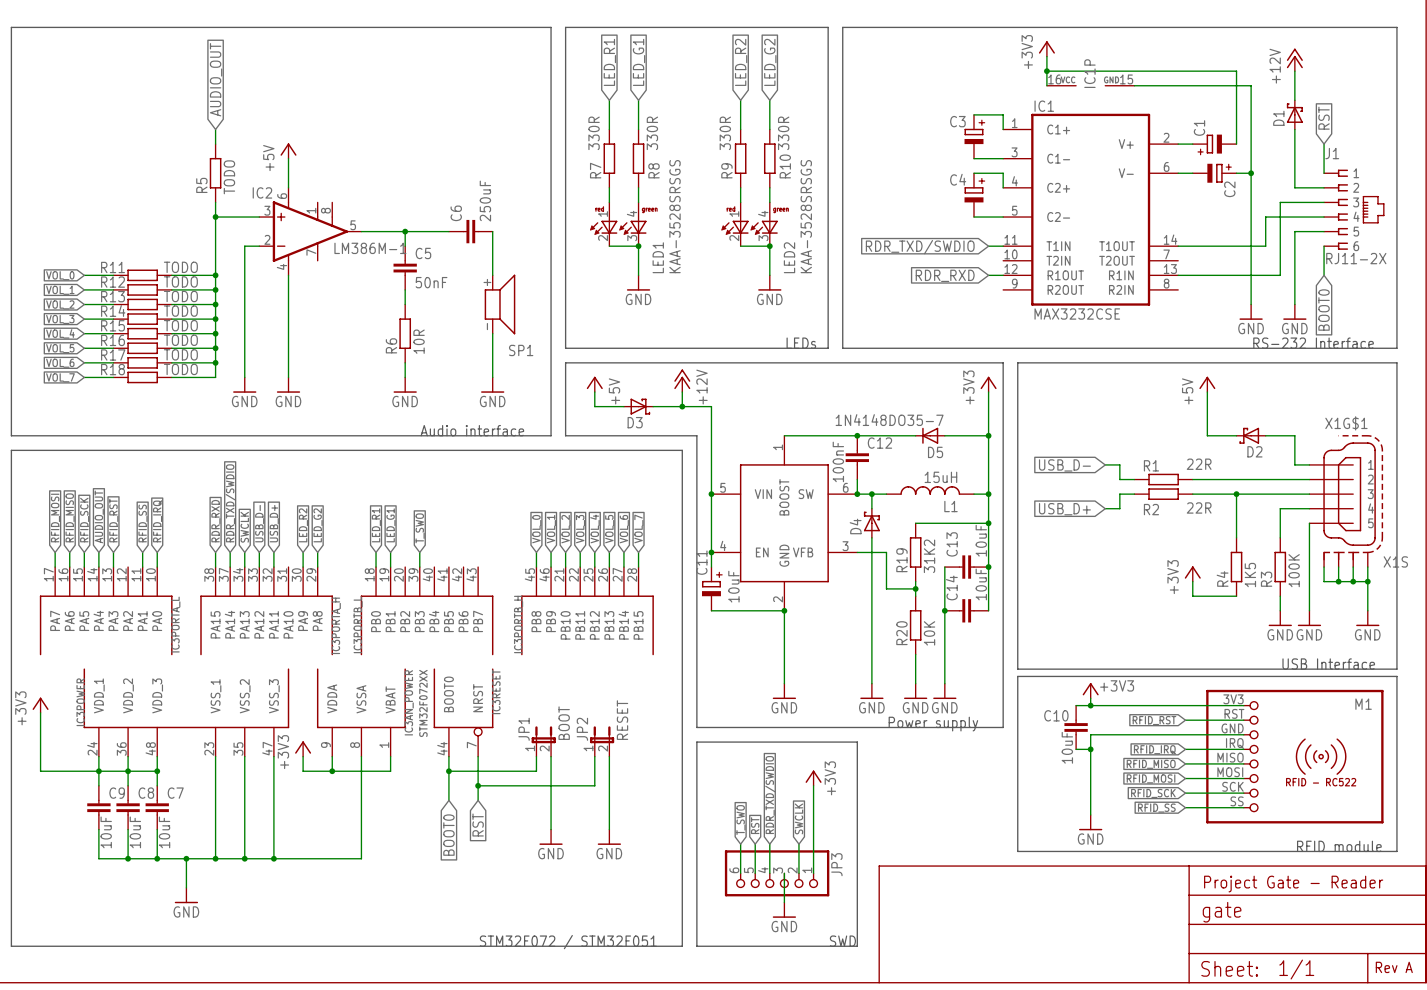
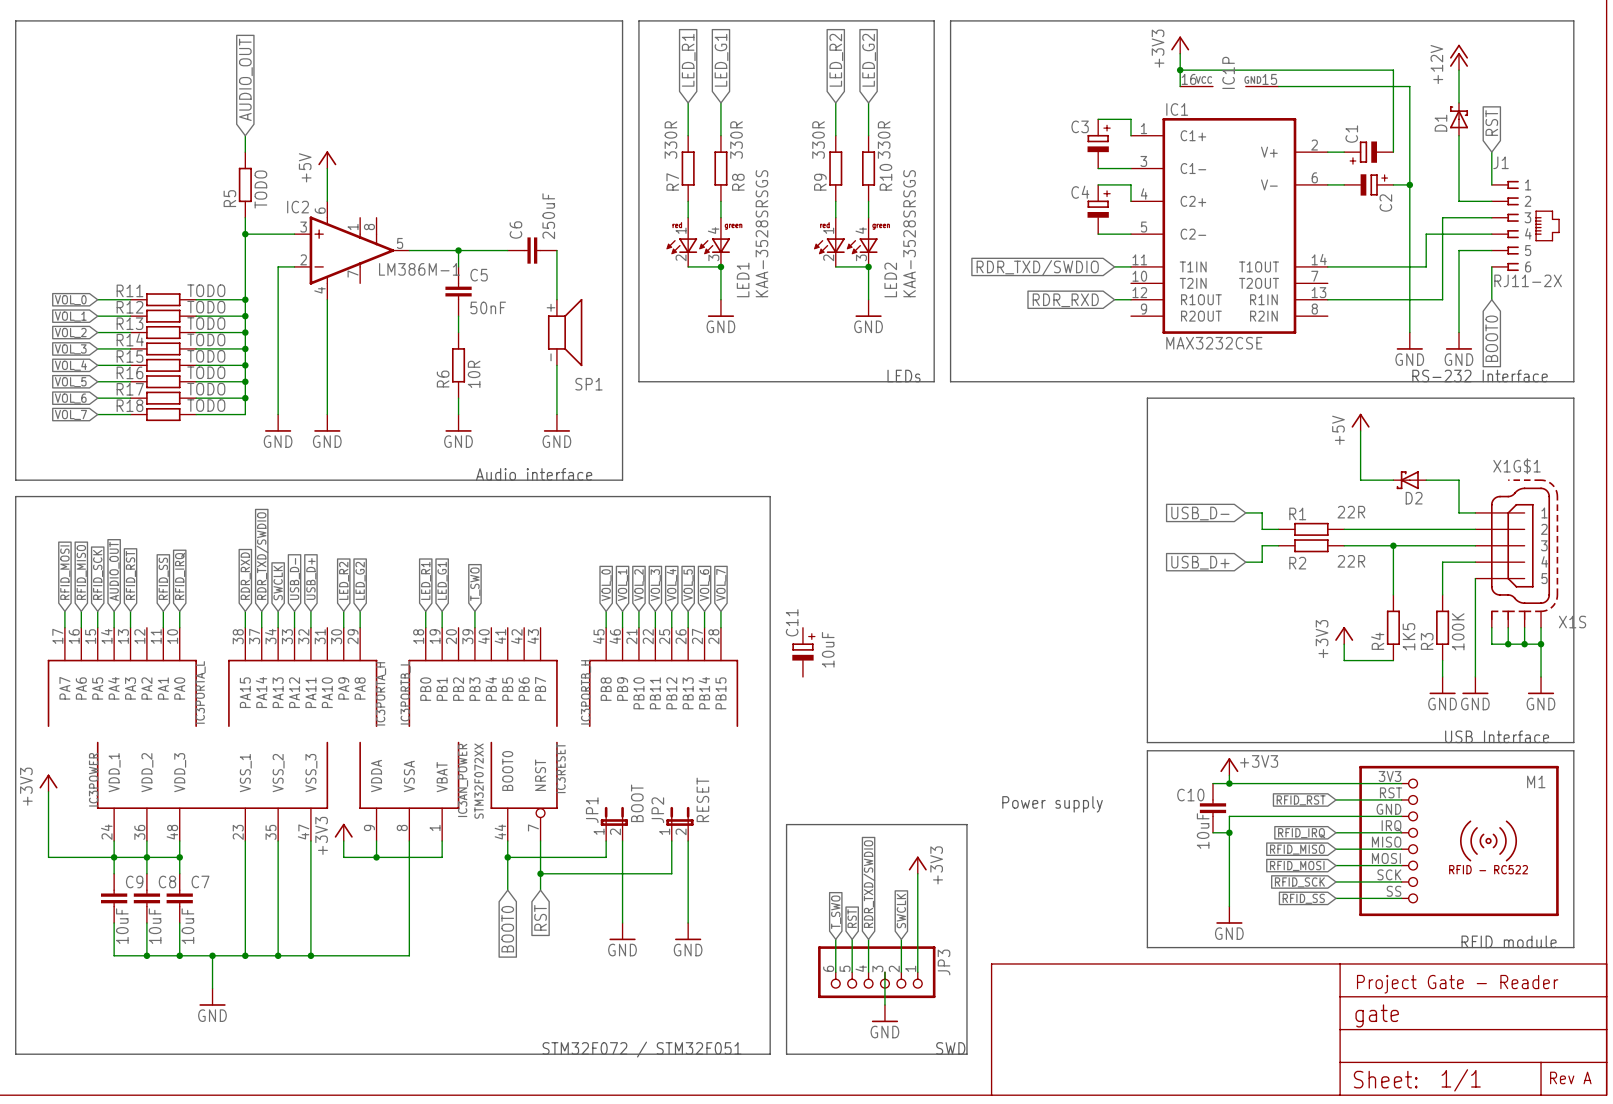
line: (565, 362) (1003, 362) (1003, 727) (696, 727) (696, 435) (565, 435) (565, 362) -> none
power symbol: +12V (682, 380) -> none
power symbol: +5V (594, 384) -> none
power symbol: +3V3 (988, 384) -> none
wire: (594, 392) (594, 406) (623, 406) -> none
wire: (682, 392) (682, 406) -> none
wire: (988, 392) (988, 610) -> none
D3: (638, 406) -> none
wire: (653, 406) (711, 406) (711, 567) -> none
junction: (682, 406) -> none
wire: (784, 435) (915, 435) -> none
junction: (857, 435) -> none
D5: 1N4148DO35-7 (930, 435) -> none
wire: (944, 435) (988, 435) -> none
junction: (988, 435) -> none
C12: 100nF (857, 457) -> none
wire: (857, 479) (857, 494) (886, 494) -> none
L1: 15uH (930, 490) -> none
junction: (711, 494) -> none
junction: (857, 494) -> none
wire: (871, 494) (871, 508) -> none
junction: (871, 494) -> none
wire: (974, 494) (988, 494) -> none
junction: (988, 494) -> none
part: (784, 523) -> none
D4: (871, 523) -> none
wire: (915, 523) (988, 523) -> none
junction: (988, 523) -> none
wire: (871, 537) (871, 683) -> none
junction: (711, 552) -> none
wire: (857, 552) (886, 552) (886, 588) (915, 588) -> none
R19: 31K2 (915, 552) -> none
wire: (944, 567) (944, 683) -> none
C13: 10uF (966, 567) -> none
junction: (988, 567) -> none
wire: (915, 581) (915, 596) -> none
junction: (915, 588) -> none
wire: (711, 610) (784, 610) (784, 683) -> none
junction: (784, 610) -> none
junction: (944, 610) -> none
C14: 10uF (966, 610) -> none
R20: 10K (915, 625) -> none
wire: (915, 654) (915, 683) -> none
power symbol: GND (784, 691) -> none
power symbol: GND (871, 691) -> none
power symbol: GND (915, 691) -> none
power symbol: GND (944, 691) -> none

